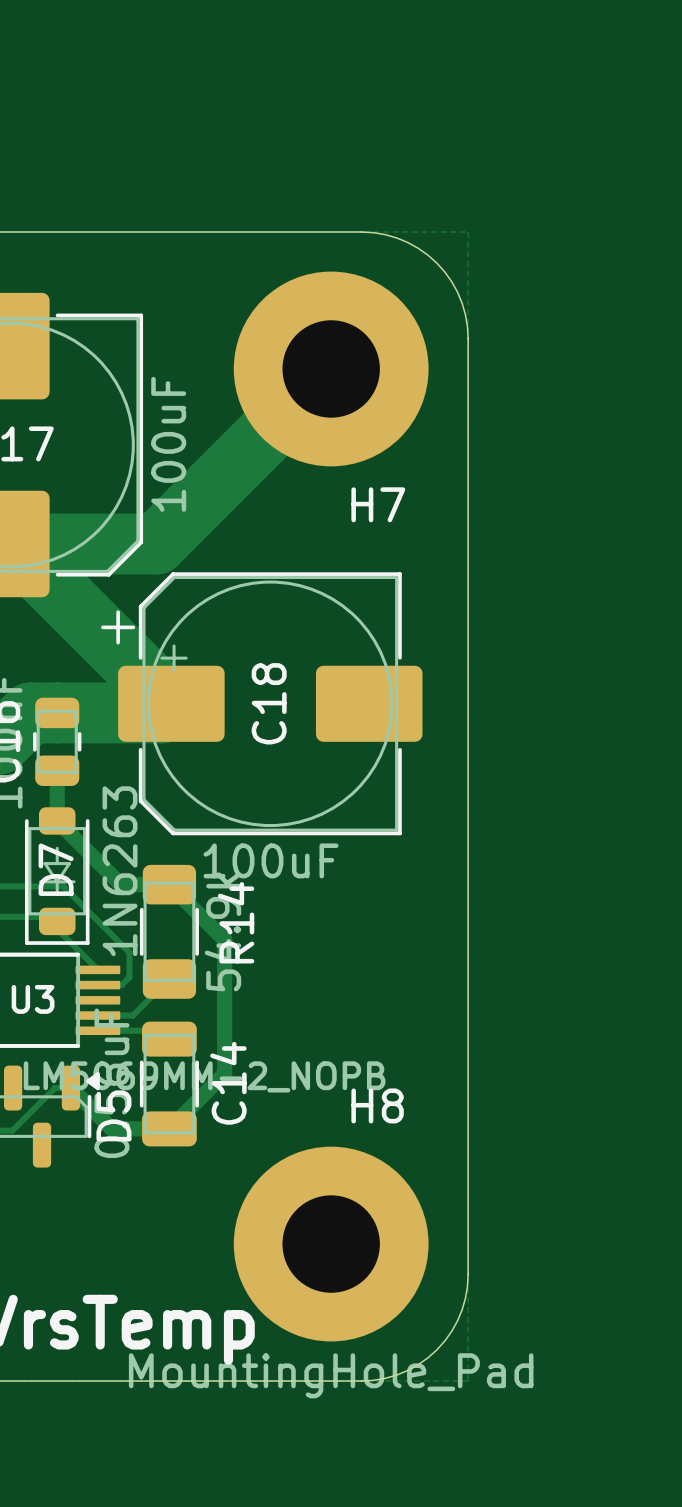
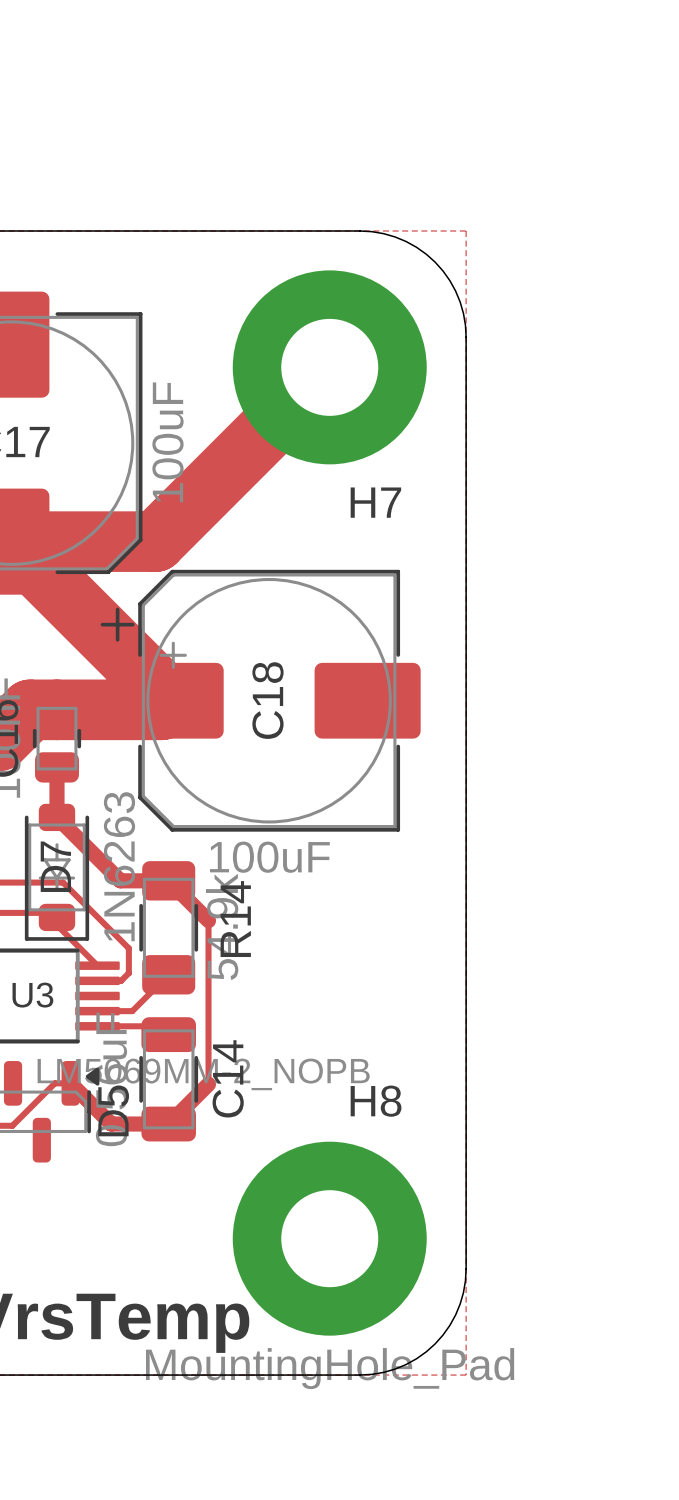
track: (209, 924) (224, 939) (224, 1073) (209, 1088) -> (208, 920) (208, 1084)

